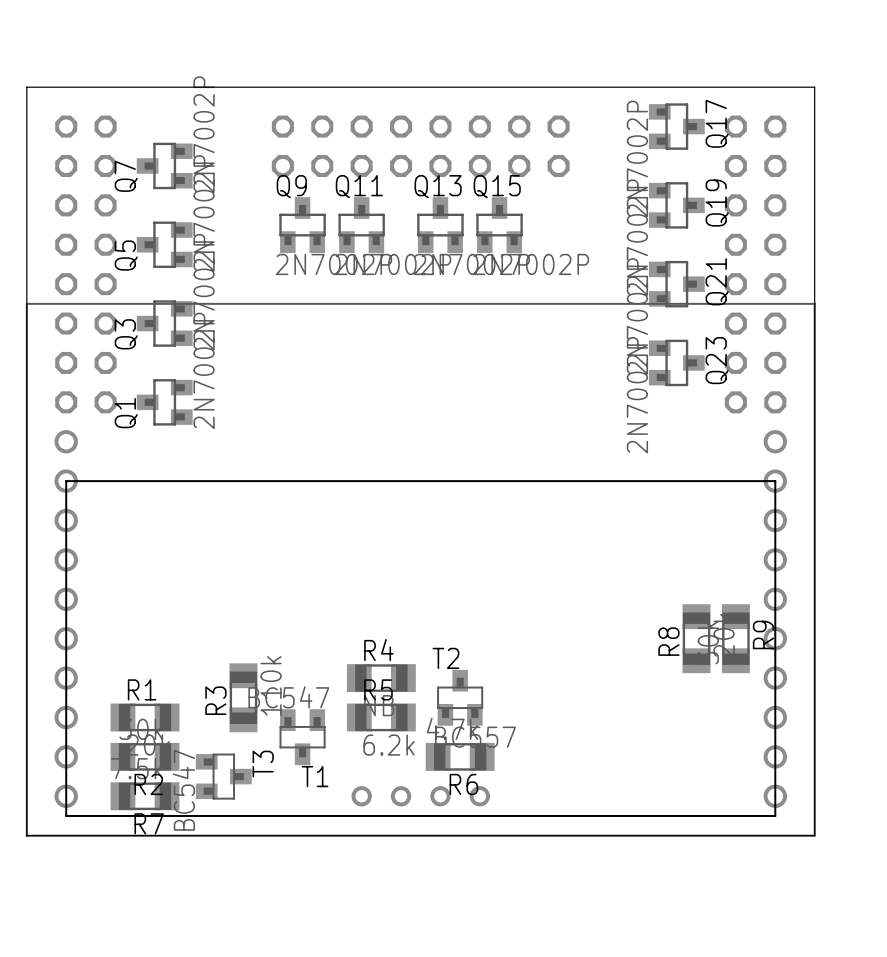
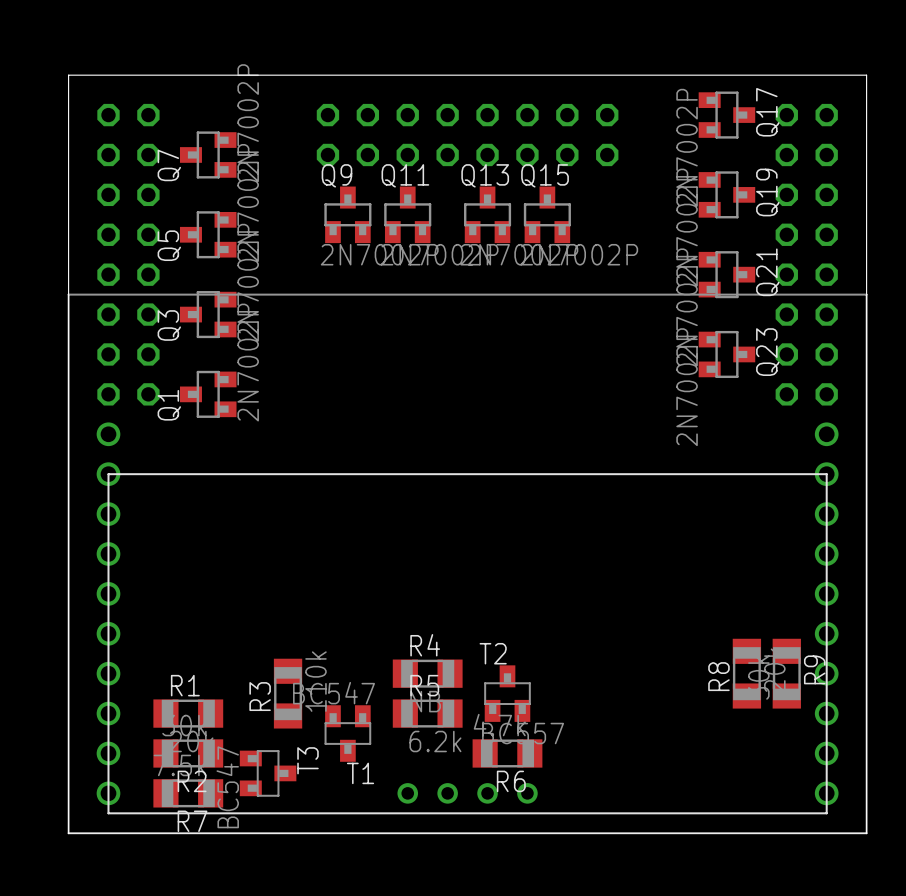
R8 position: (696, 638) -> (746, 673)
R9 position: (735, 638) -> (786, 673)

